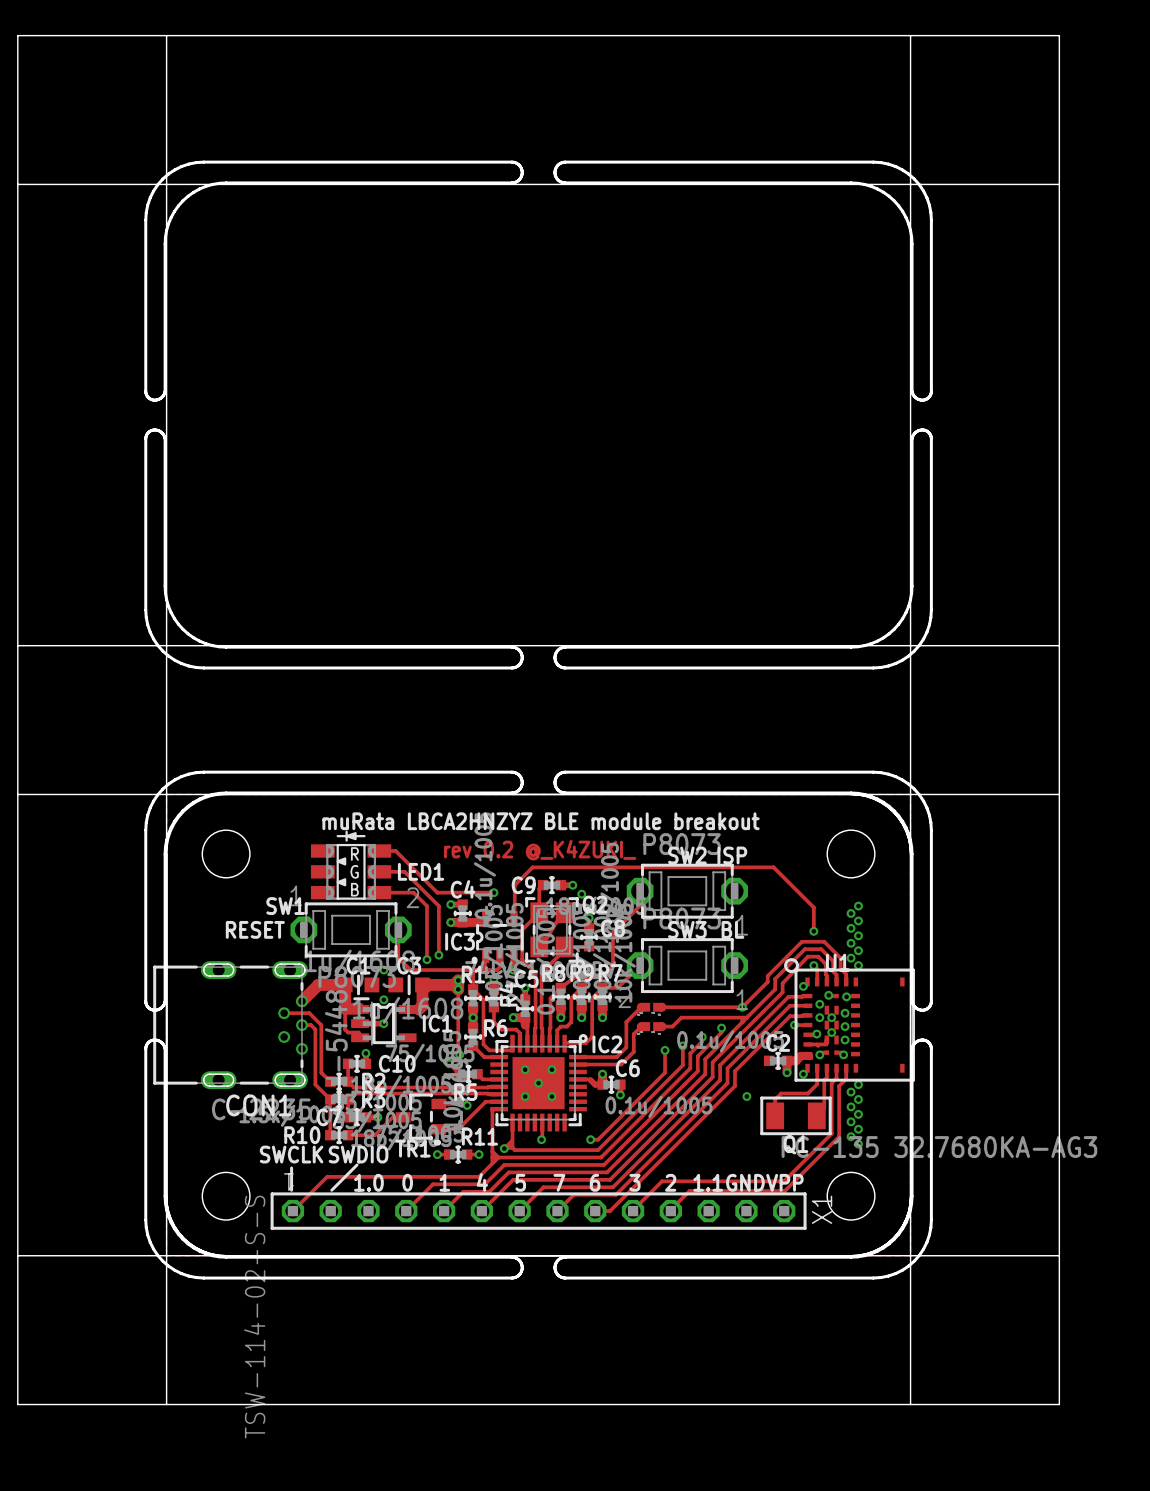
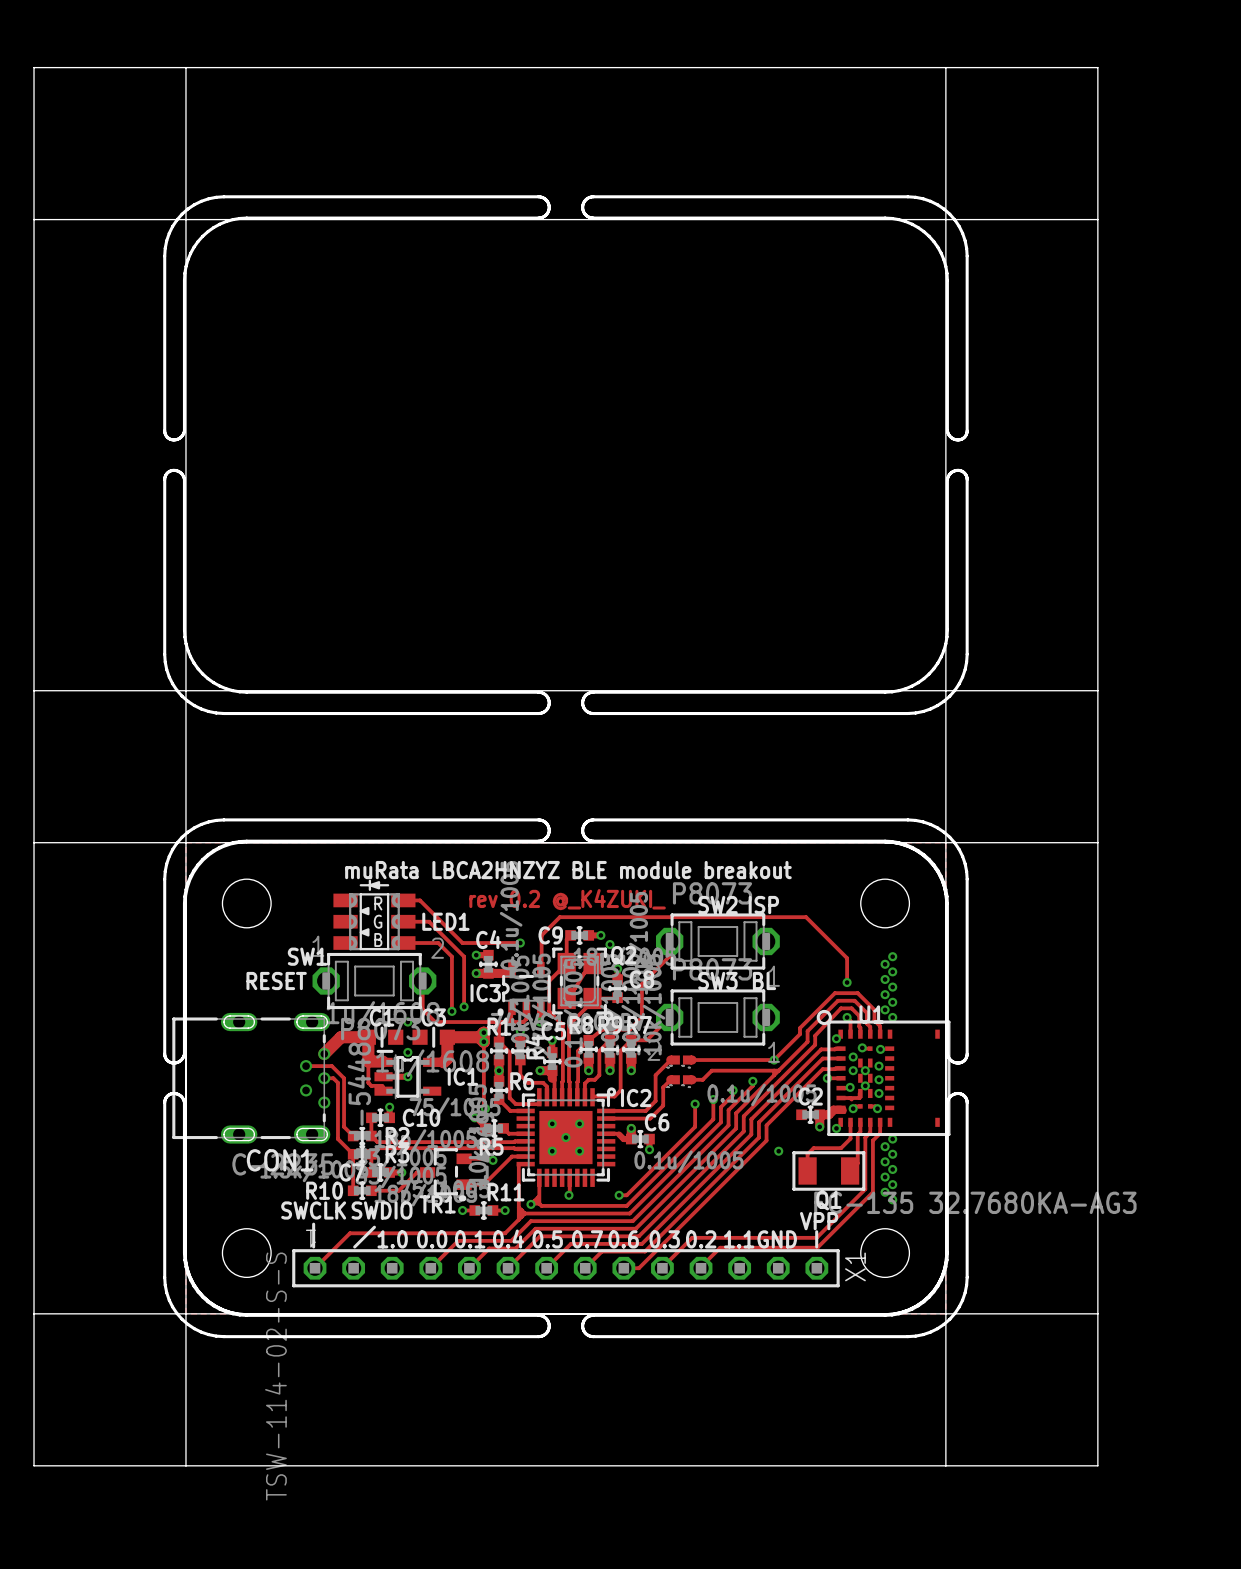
line: (357, 1164) (351, 1170) -> none
line: none -> (816, 1231) (816, 1246)
text: 0 (407, 1182) -> 0.0 (432, 1239)
text: 1 (444, 1182) -> 0.1 (470, 1239)
text: 4 (482, 1182) -> 0.4 (508, 1239)
text: 5 (520, 1182) -> 0.5 (547, 1239)
text: 7 (559, 1182) -> 0.7 (587, 1239)
text: 6 (595, 1182) -> 0.6 (623, 1239)
text: 3 (634, 1182) -> 0.3 (664, 1239)
text: 2 (670, 1182) -> 0.2 (701, 1239)
text position: VPP (784, 1182) -> VPP (819, 1221)

